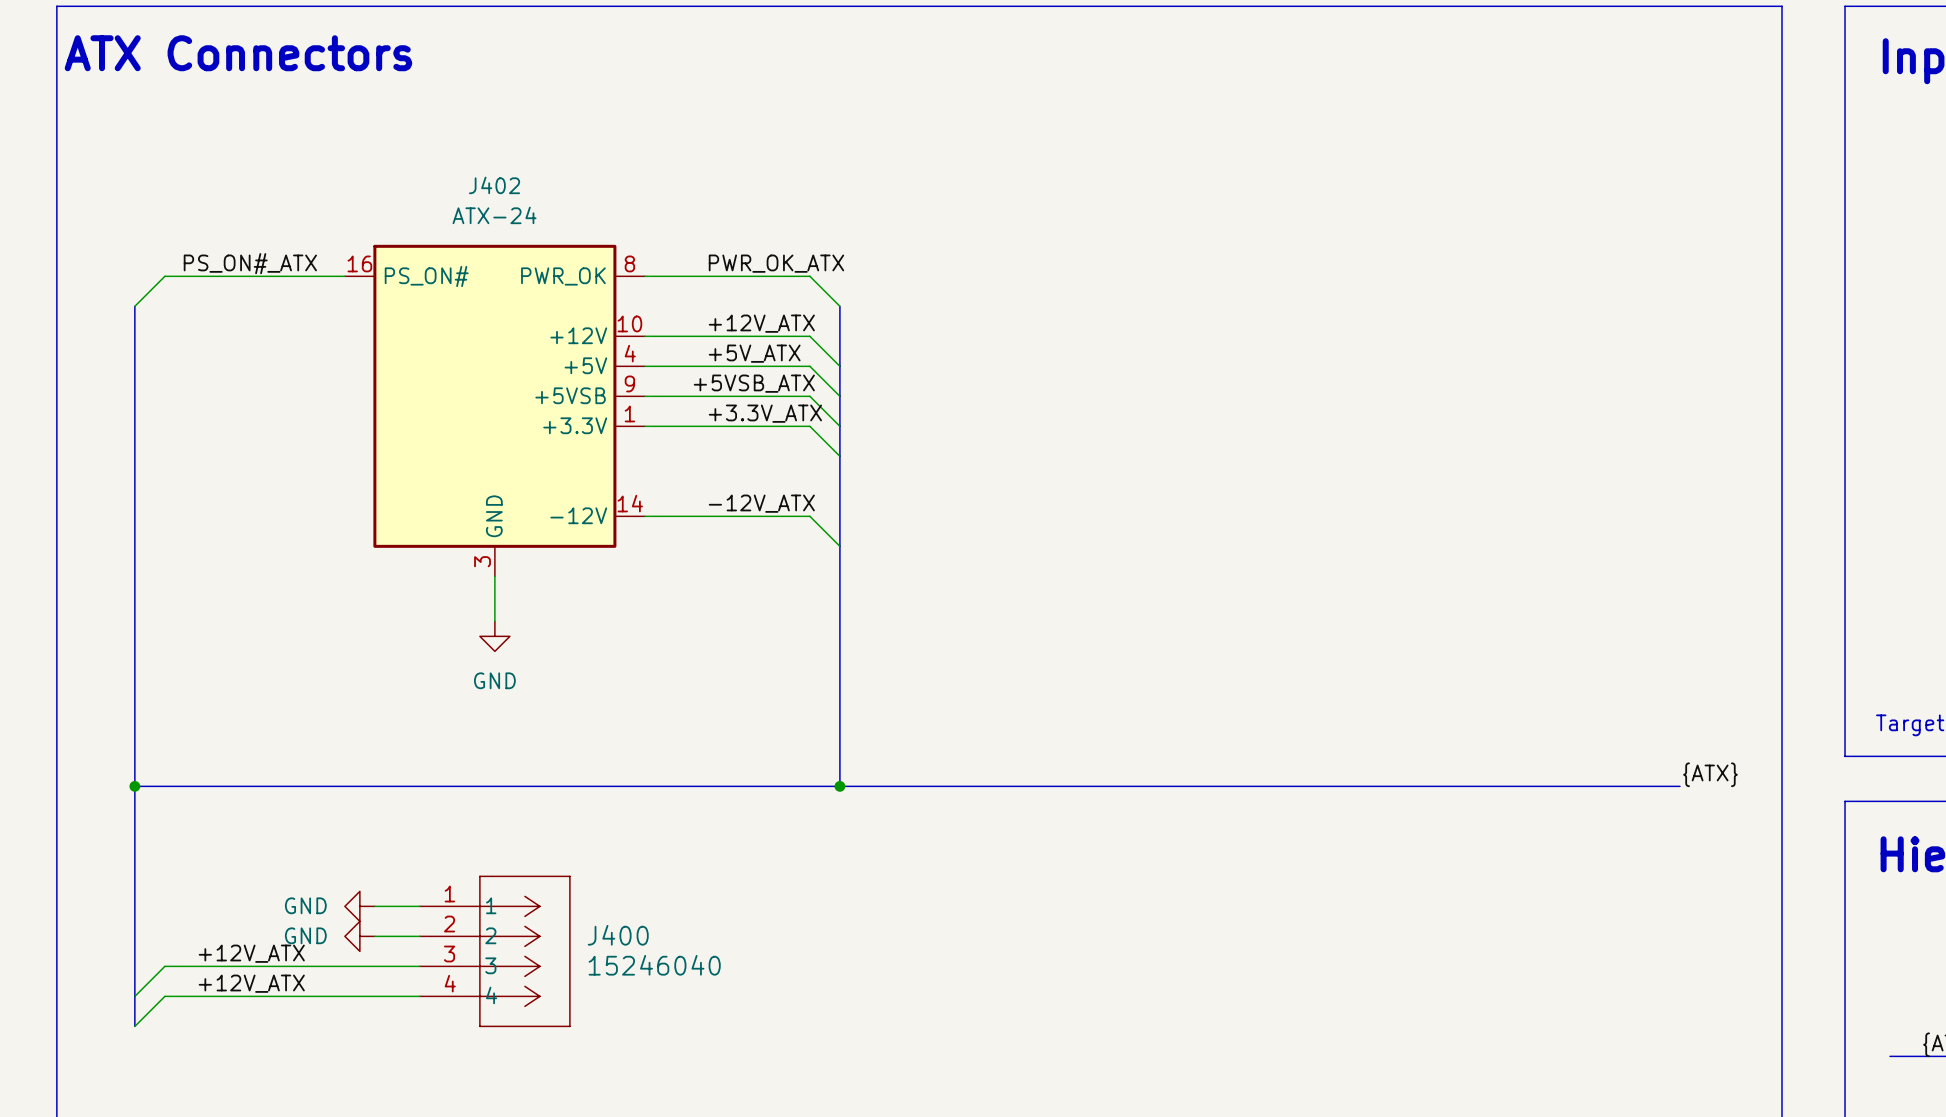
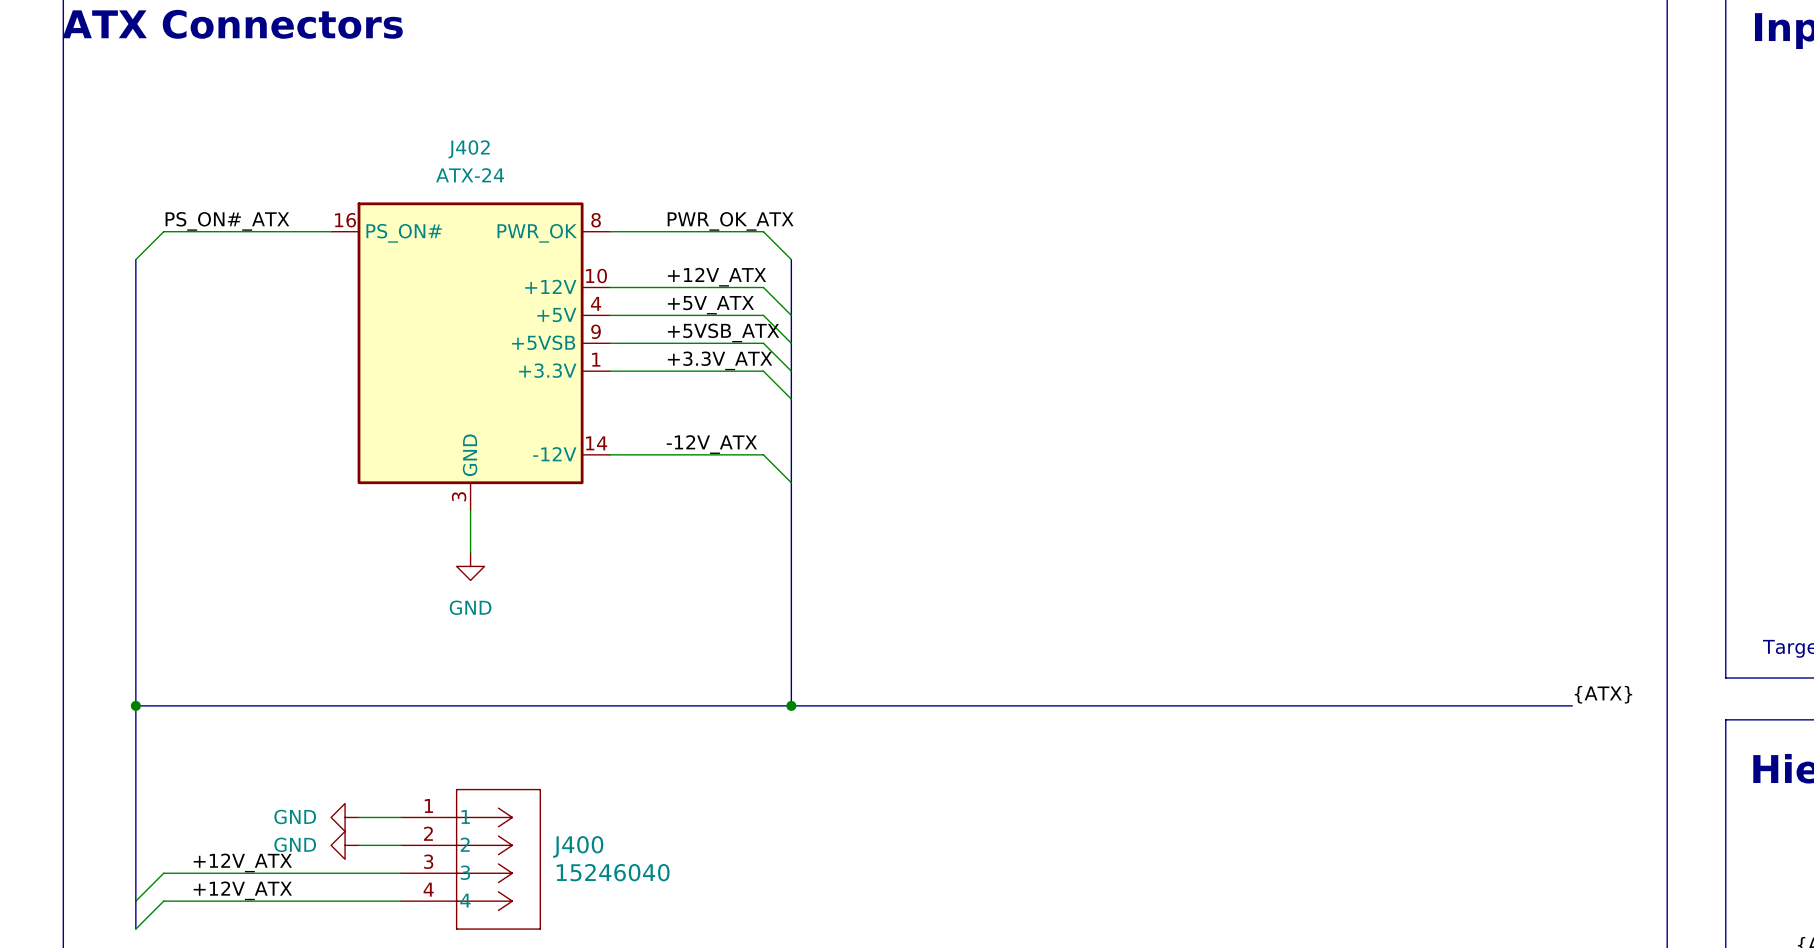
label position: PS_ON#_ATX (250, 263) -> PS_ON#_ATX (227, 221)
label position: +5VSB_ATX (754, 383) -> +5VSB_ATX (723, 332)

